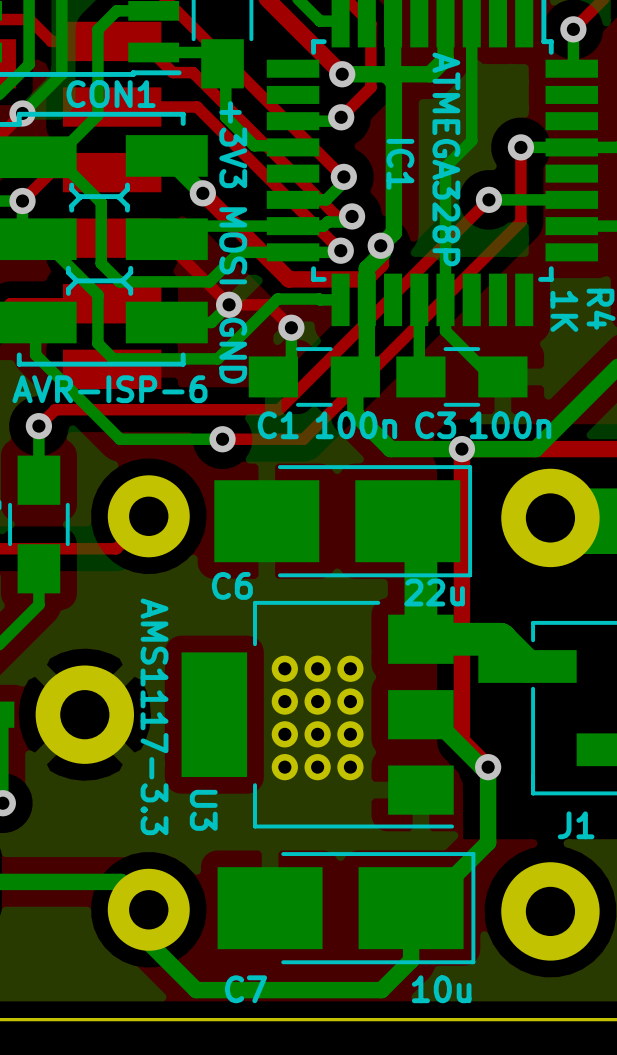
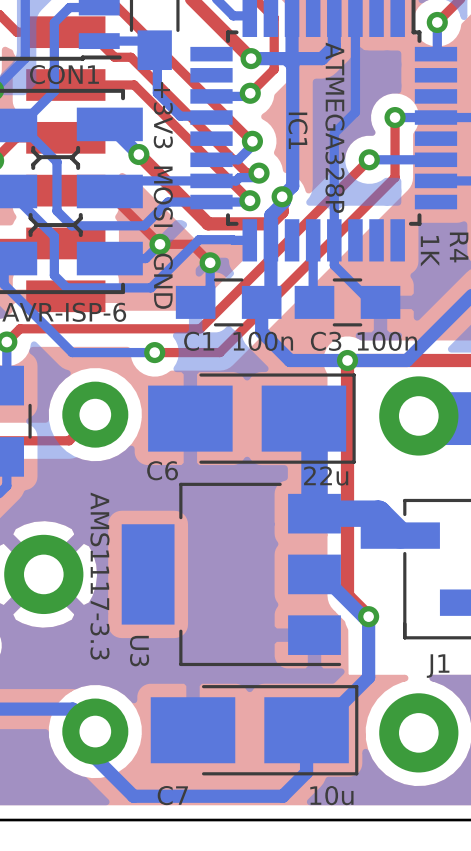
part: (284, 668) -> none
part: (317, 668) -> none
part: (350, 668) -> none
part: (284, 701) -> none
part: (317, 701) -> none
part: (350, 701) -> none
part: (284, 734) -> none
part: (317, 734) -> none
part: (350, 734) -> none
part: (284, 767) -> none
part: (317, 767) -> none
part: (350, 767) -> none

